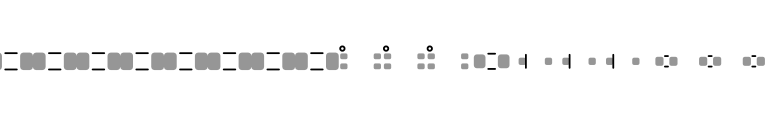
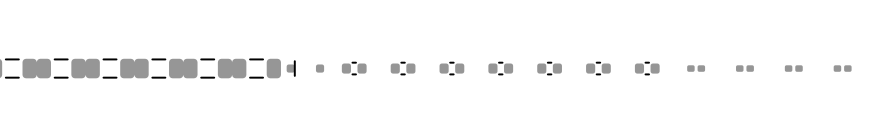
part footprint: [339, 45, 381, 70] -> [390, 61, 416, 76]
part footprint: [383, 45, 425, 70] -> [439, 61, 465, 76]
part footprint: [426, 45, 469, 70] -> [488, 61, 514, 76]
part footprint: [251, 52, 296, 71] -> [286, 60, 325, 77]
part footprint: [295, 52, 339, 71] -> [341, 61, 367, 76]
part footprint: [473, 52, 510, 70] -> [537, 61, 562, 76]
part footprint: [518, 53, 553, 69] -> [586, 61, 611, 76]
part footprint: [562, 53, 596, 69] -> [634, 61, 660, 76]
part footprint: [606, 53, 640, 69] -> [687, 65, 706, 72]
part footprint: [655, 55, 678, 68] -> [736, 65, 754, 72]
part footprint: [699, 55, 722, 68] -> [784, 65, 803, 72]
part footprint: [742, 55, 765, 68] -> [833, 65, 852, 72]

